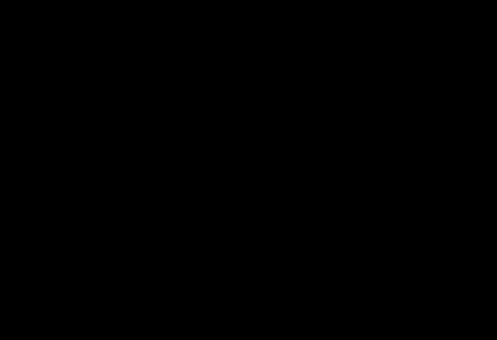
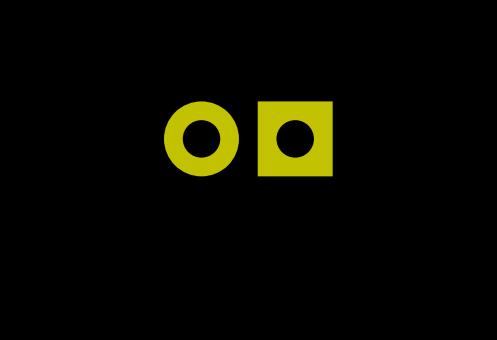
part: none -> (248, 138)

